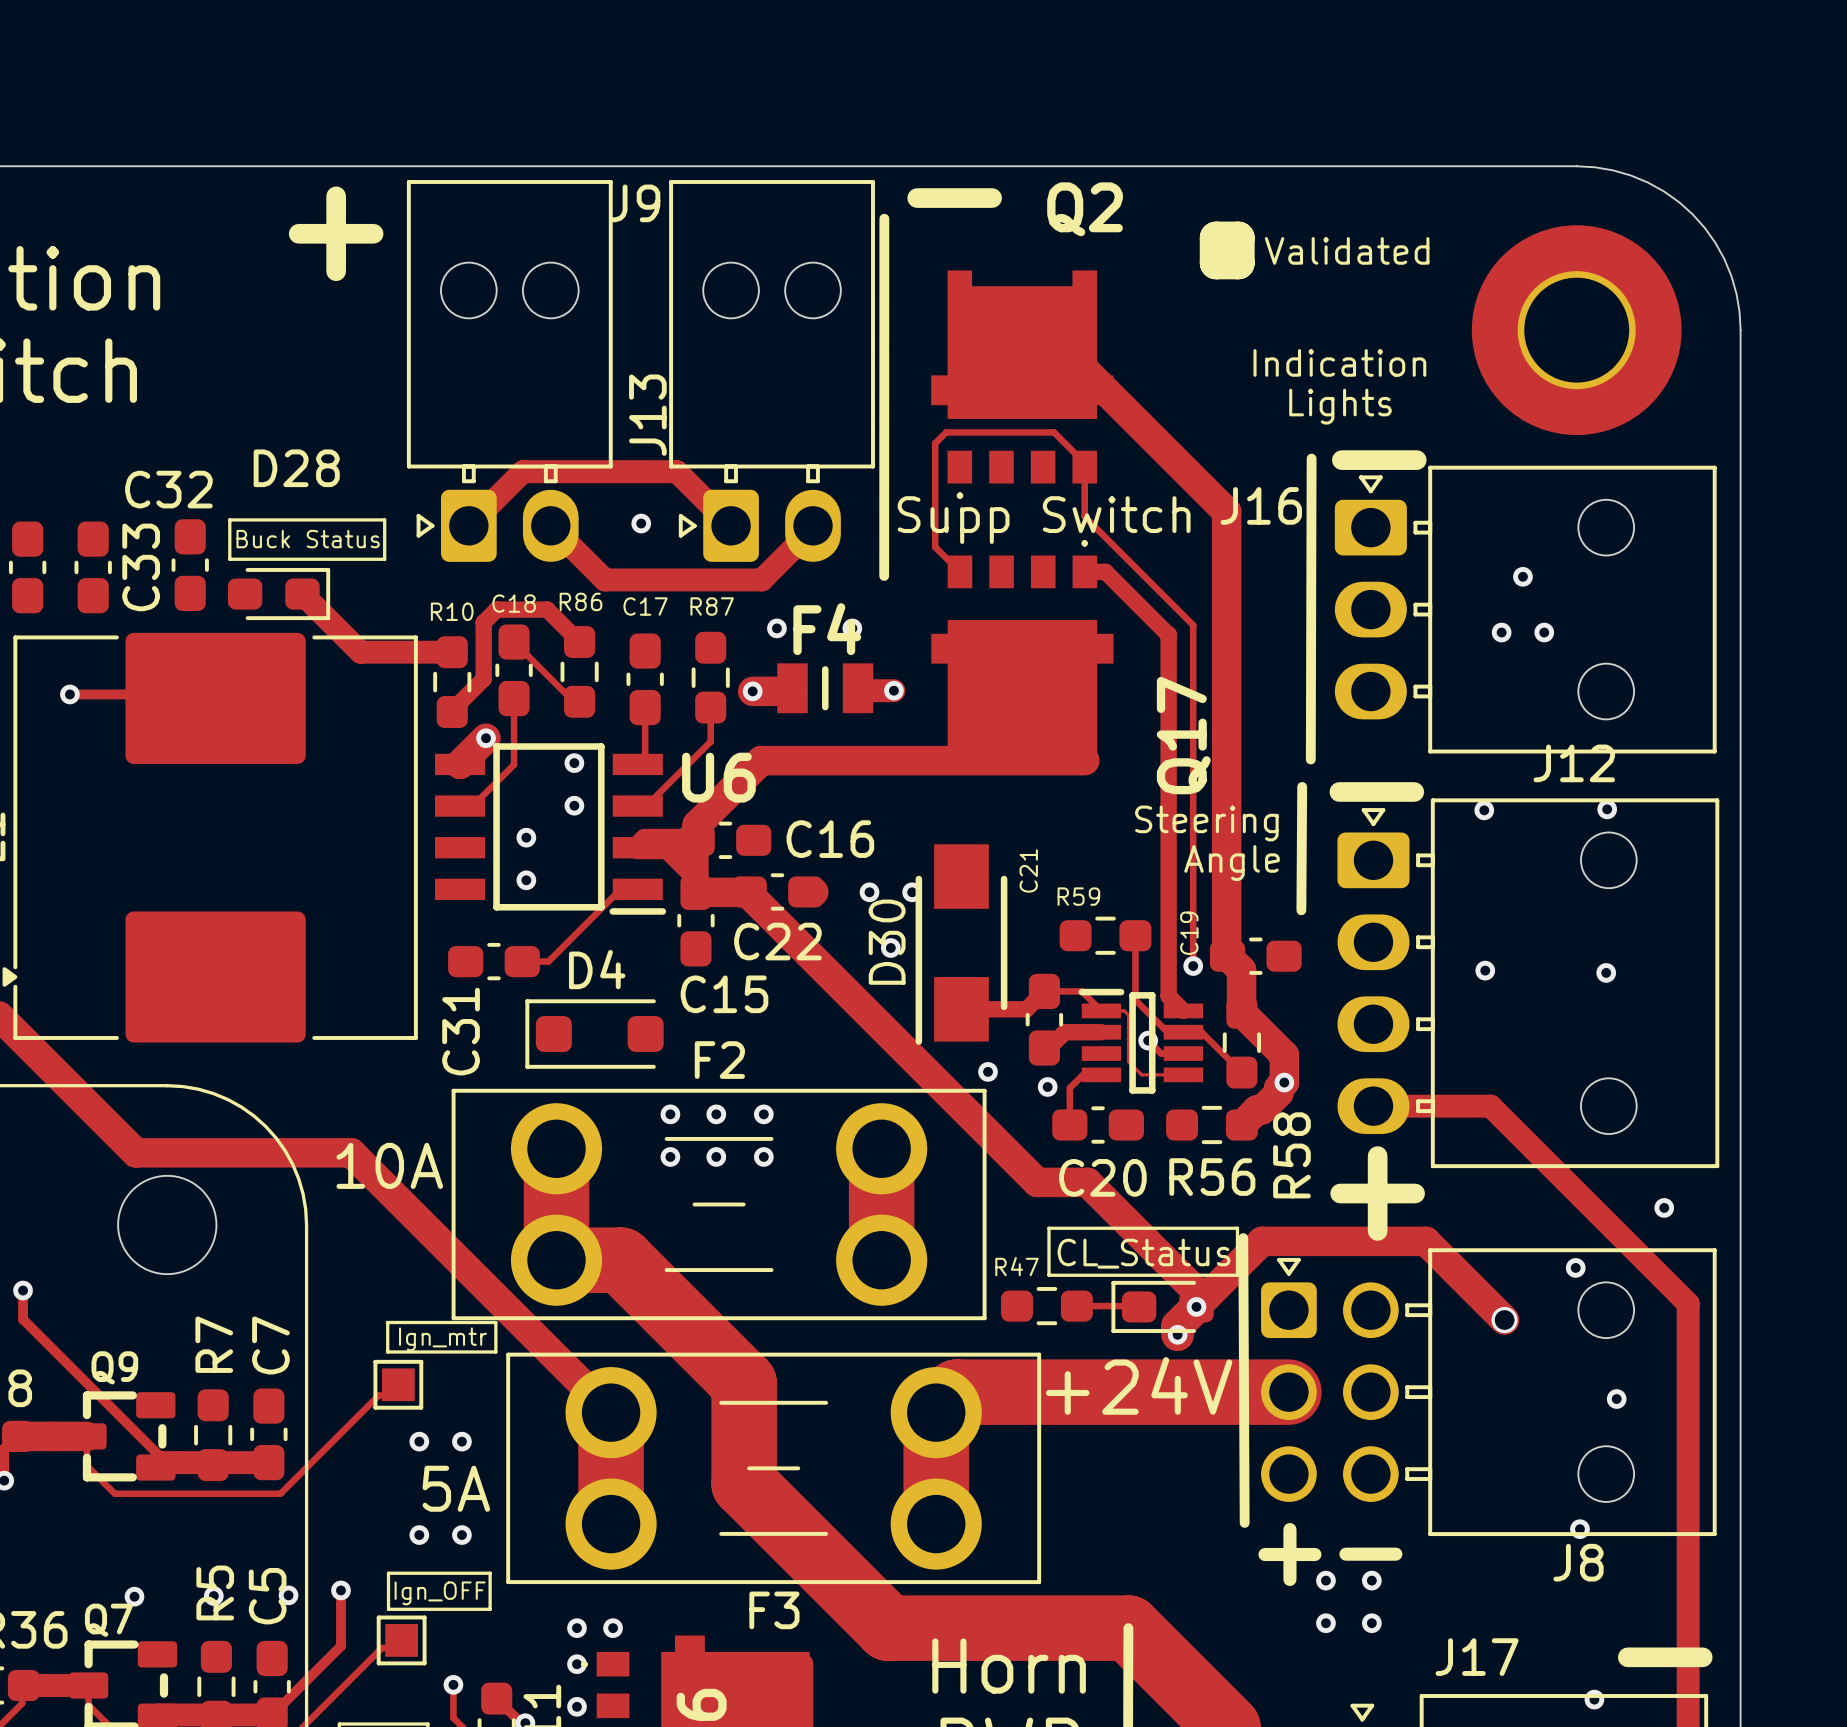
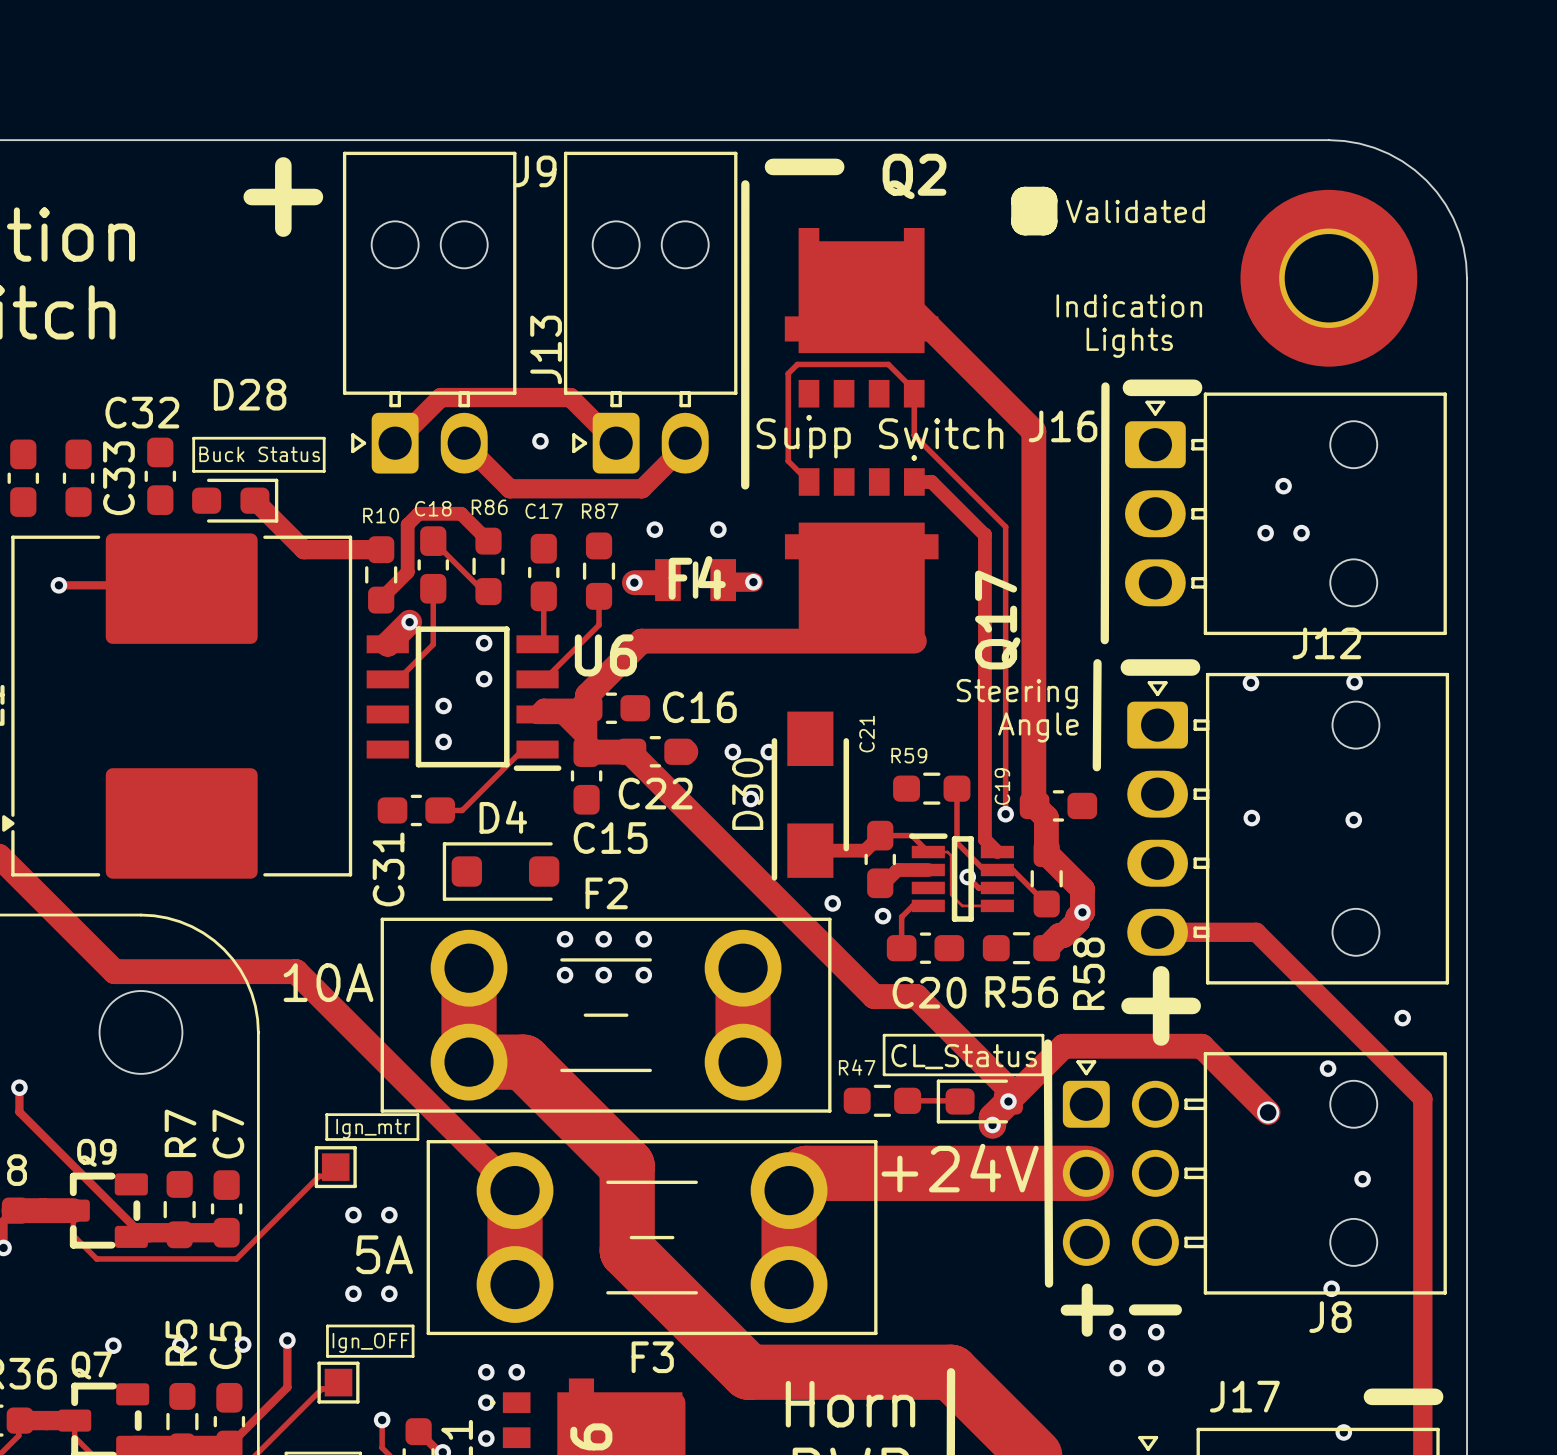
F4 name position: F4 (827, 629) -> F4 (697, 577)

